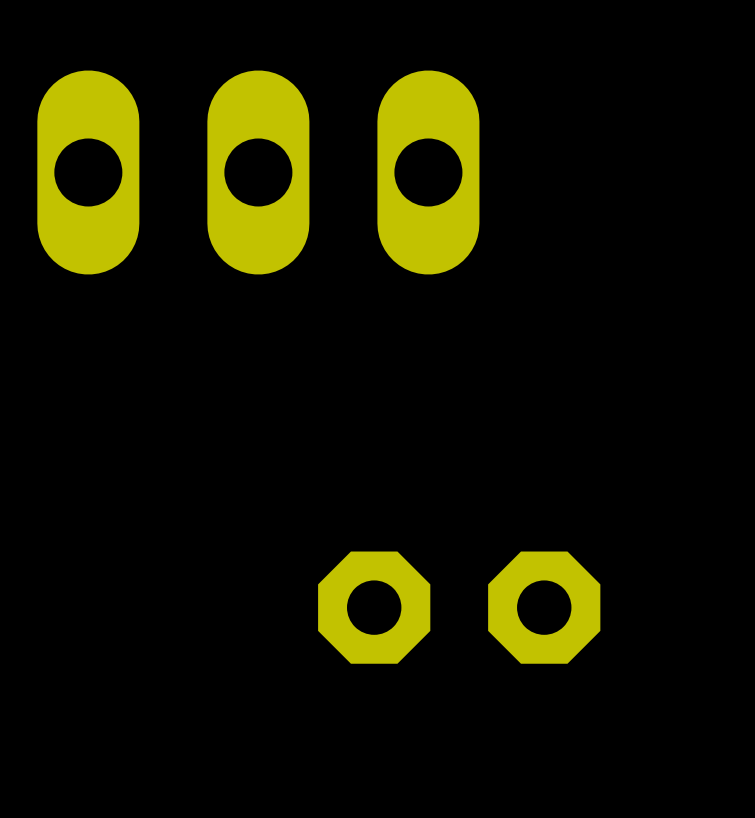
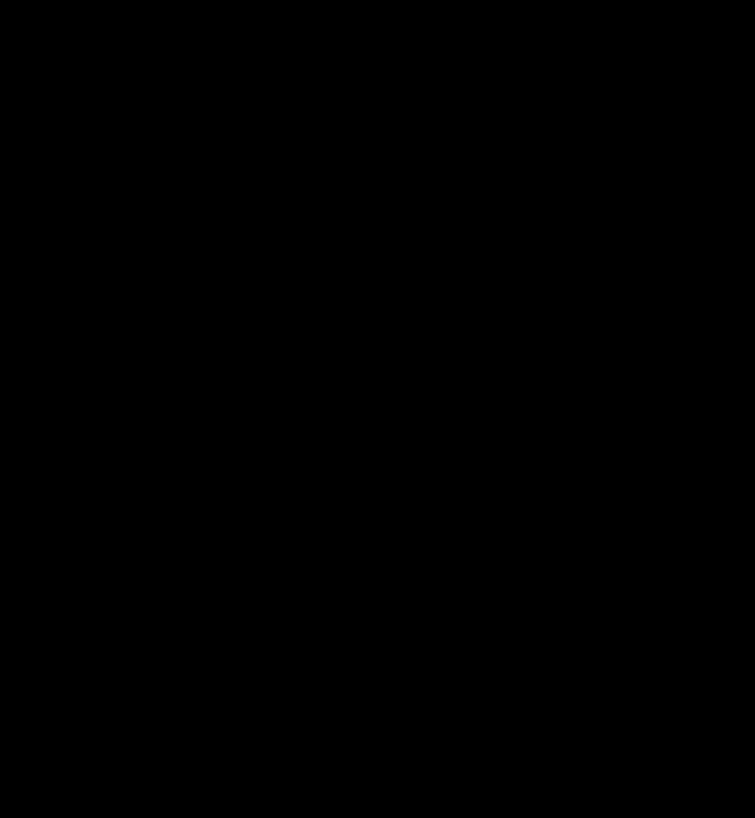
part: (258, 172) -> none
part: (459, 607) -> none

